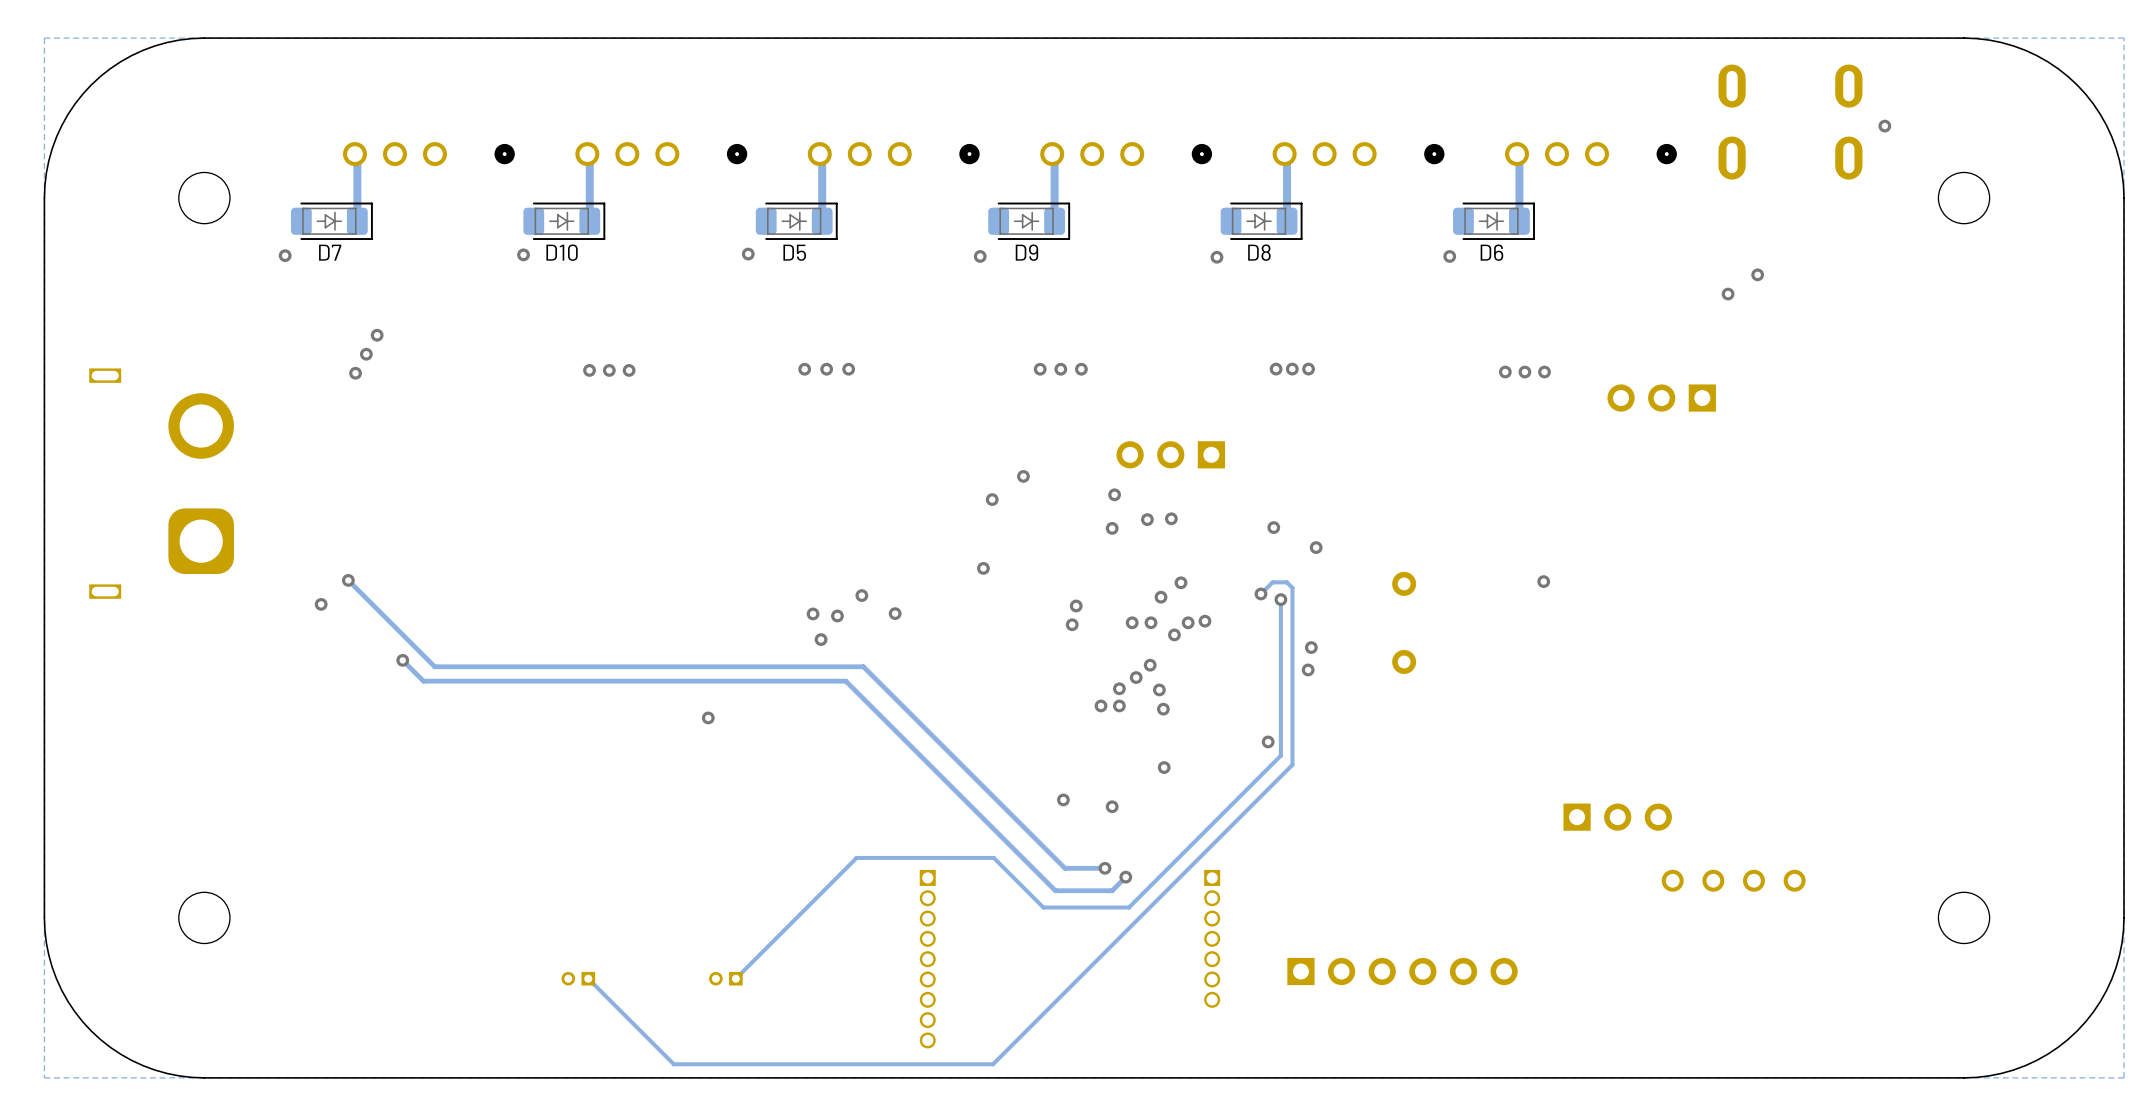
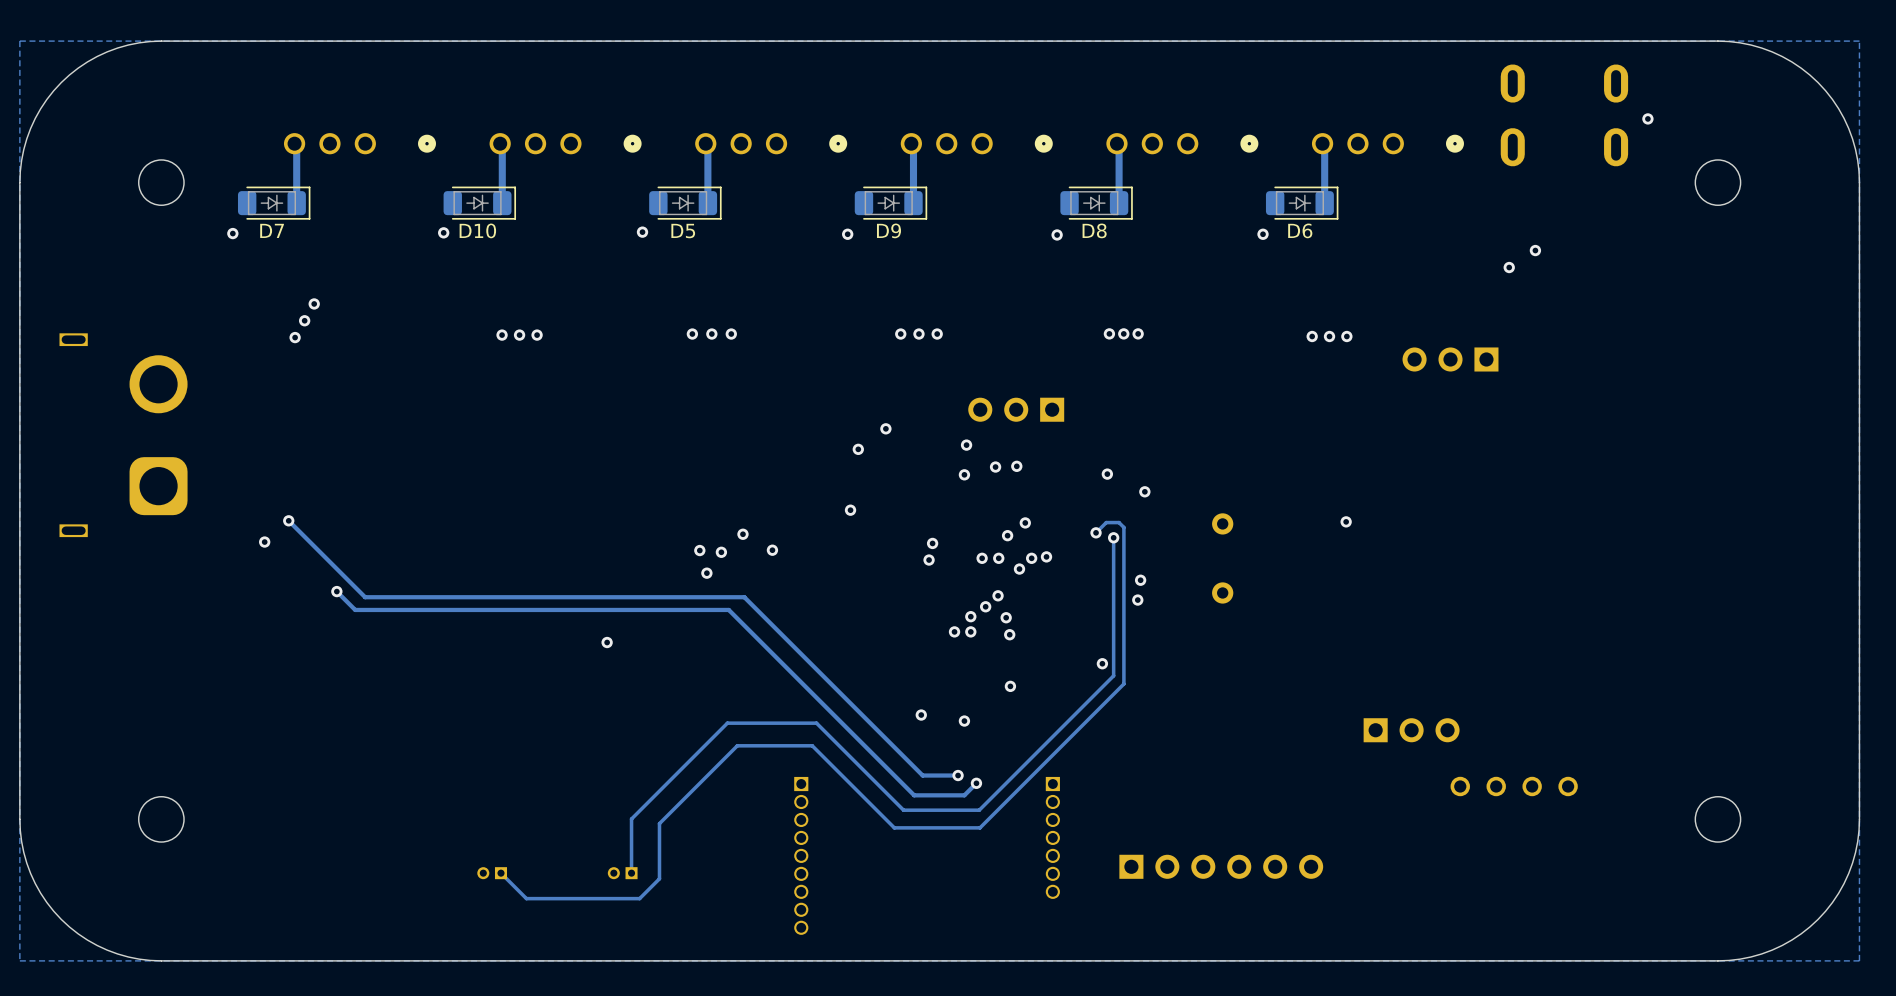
track: (993, 857) (856, 857) (735, 978) -> (859, 766) (816, 723) (727, 723) (631, 819) (631, 873)
track: (1129, 927) (993, 1064) (673, 1064) (617, 1007) -> (980, 827) (894, 827) (812, 745) (737, 745) (659, 823) (659, 878) (639, 898) (526, 898)

